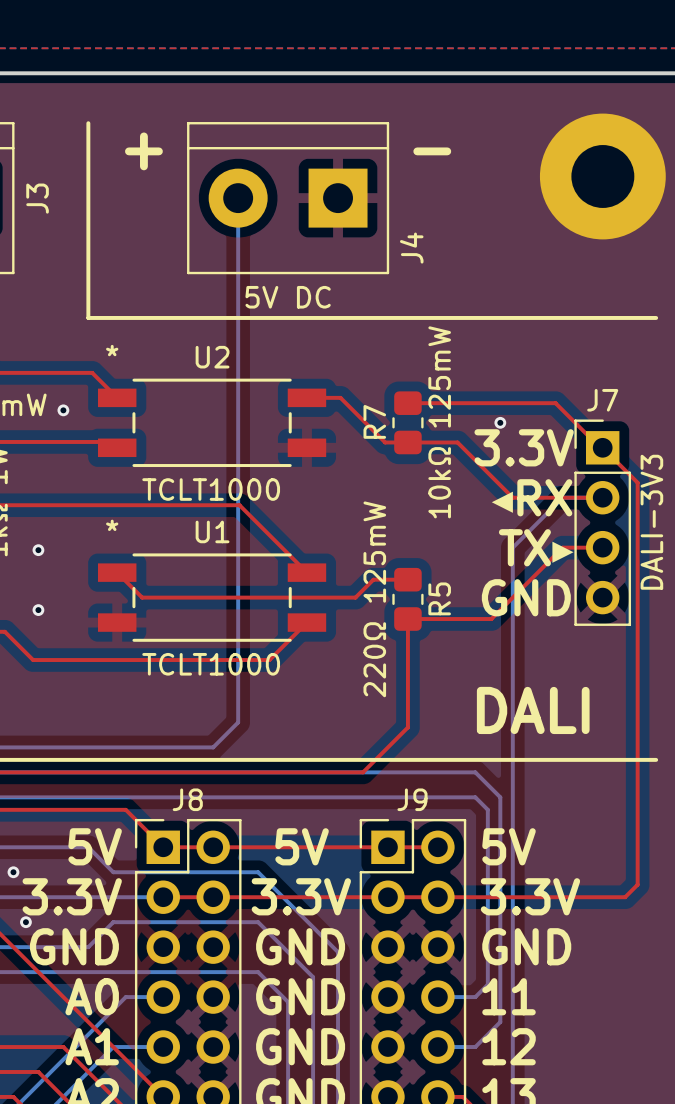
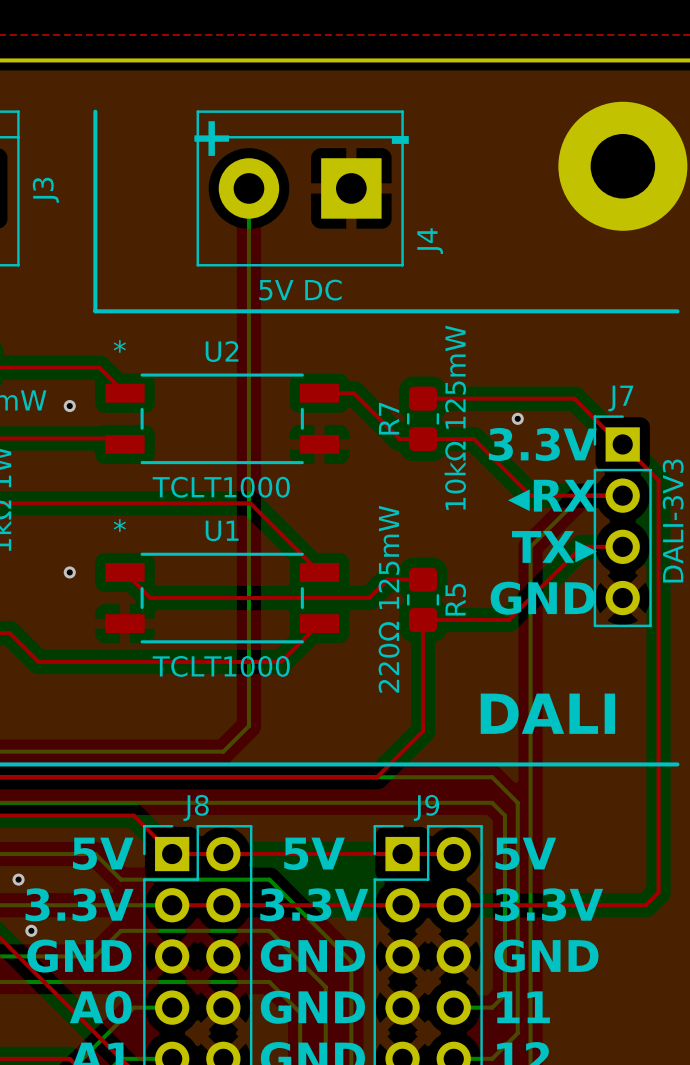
via: (38, 550) -> none
via: none -> (69, 572)
via: (38, 610) -> none

